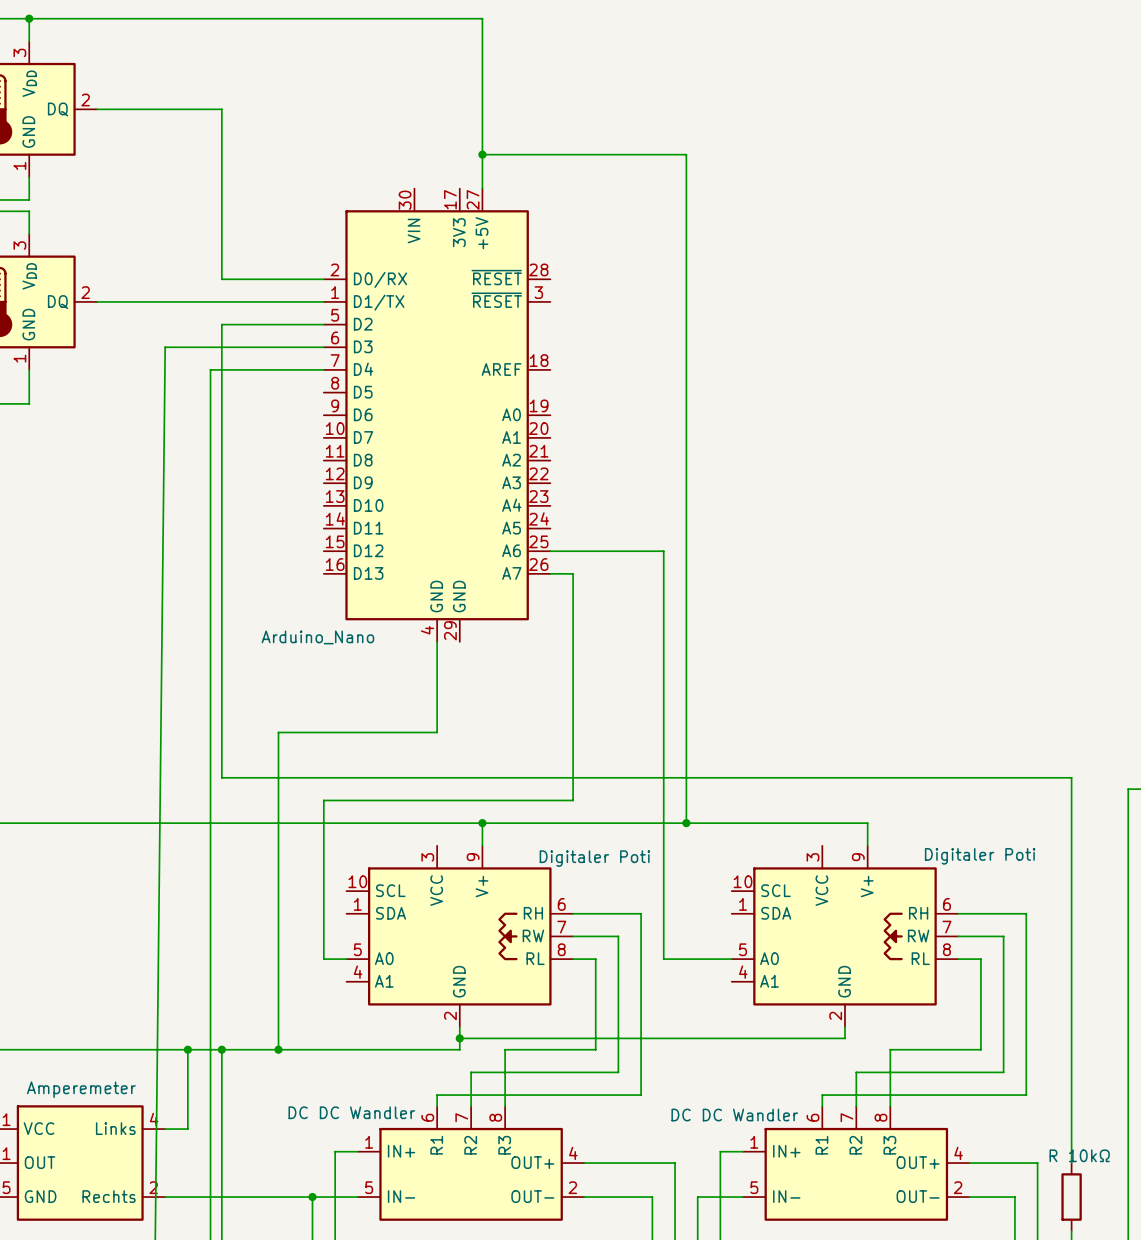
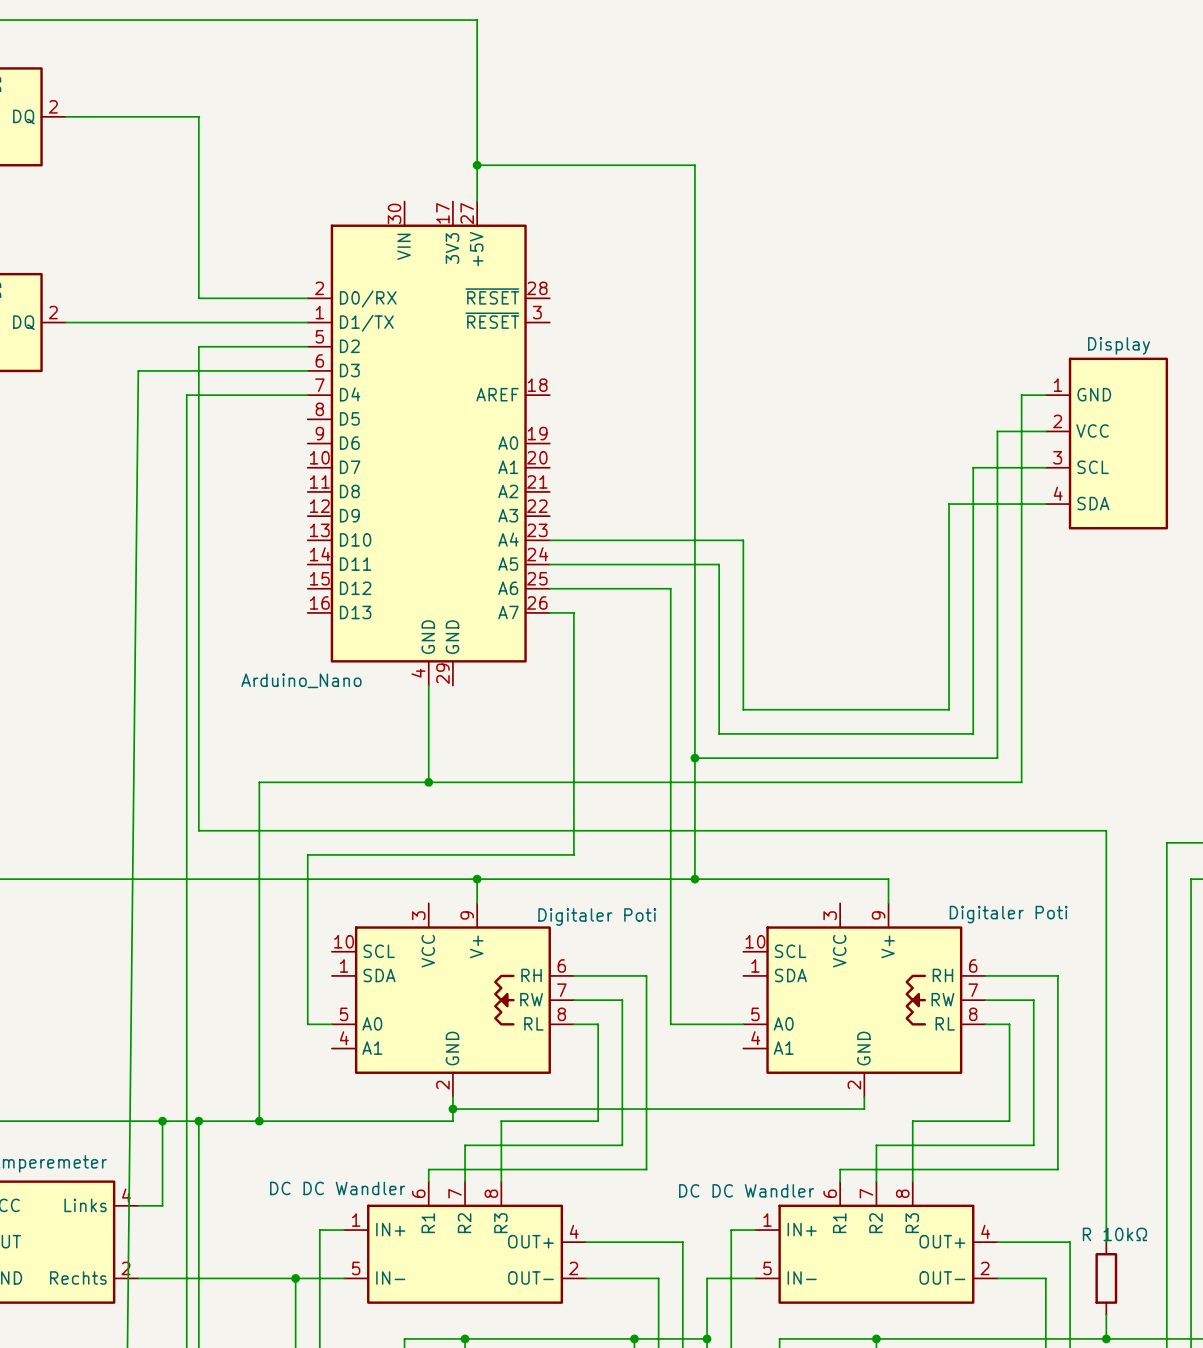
wire: none -> (1045, 395) (1021, 395) (1021, 782) (428, 782)
wire: none -> (1045, 431) (997, 431) (997, 758) (694, 758)
part: none -> Display (1106, 443)
wire: none -> (1045, 467) (973, 467) (973, 733) (719, 733) (719, 564) (549, 564)
wire: none -> (1045, 504) (949, 504) (949, 709) (743, 709) (743, 540) (549, 540)
junction: none -> (694, 758)
junction: none -> (428, 782)

